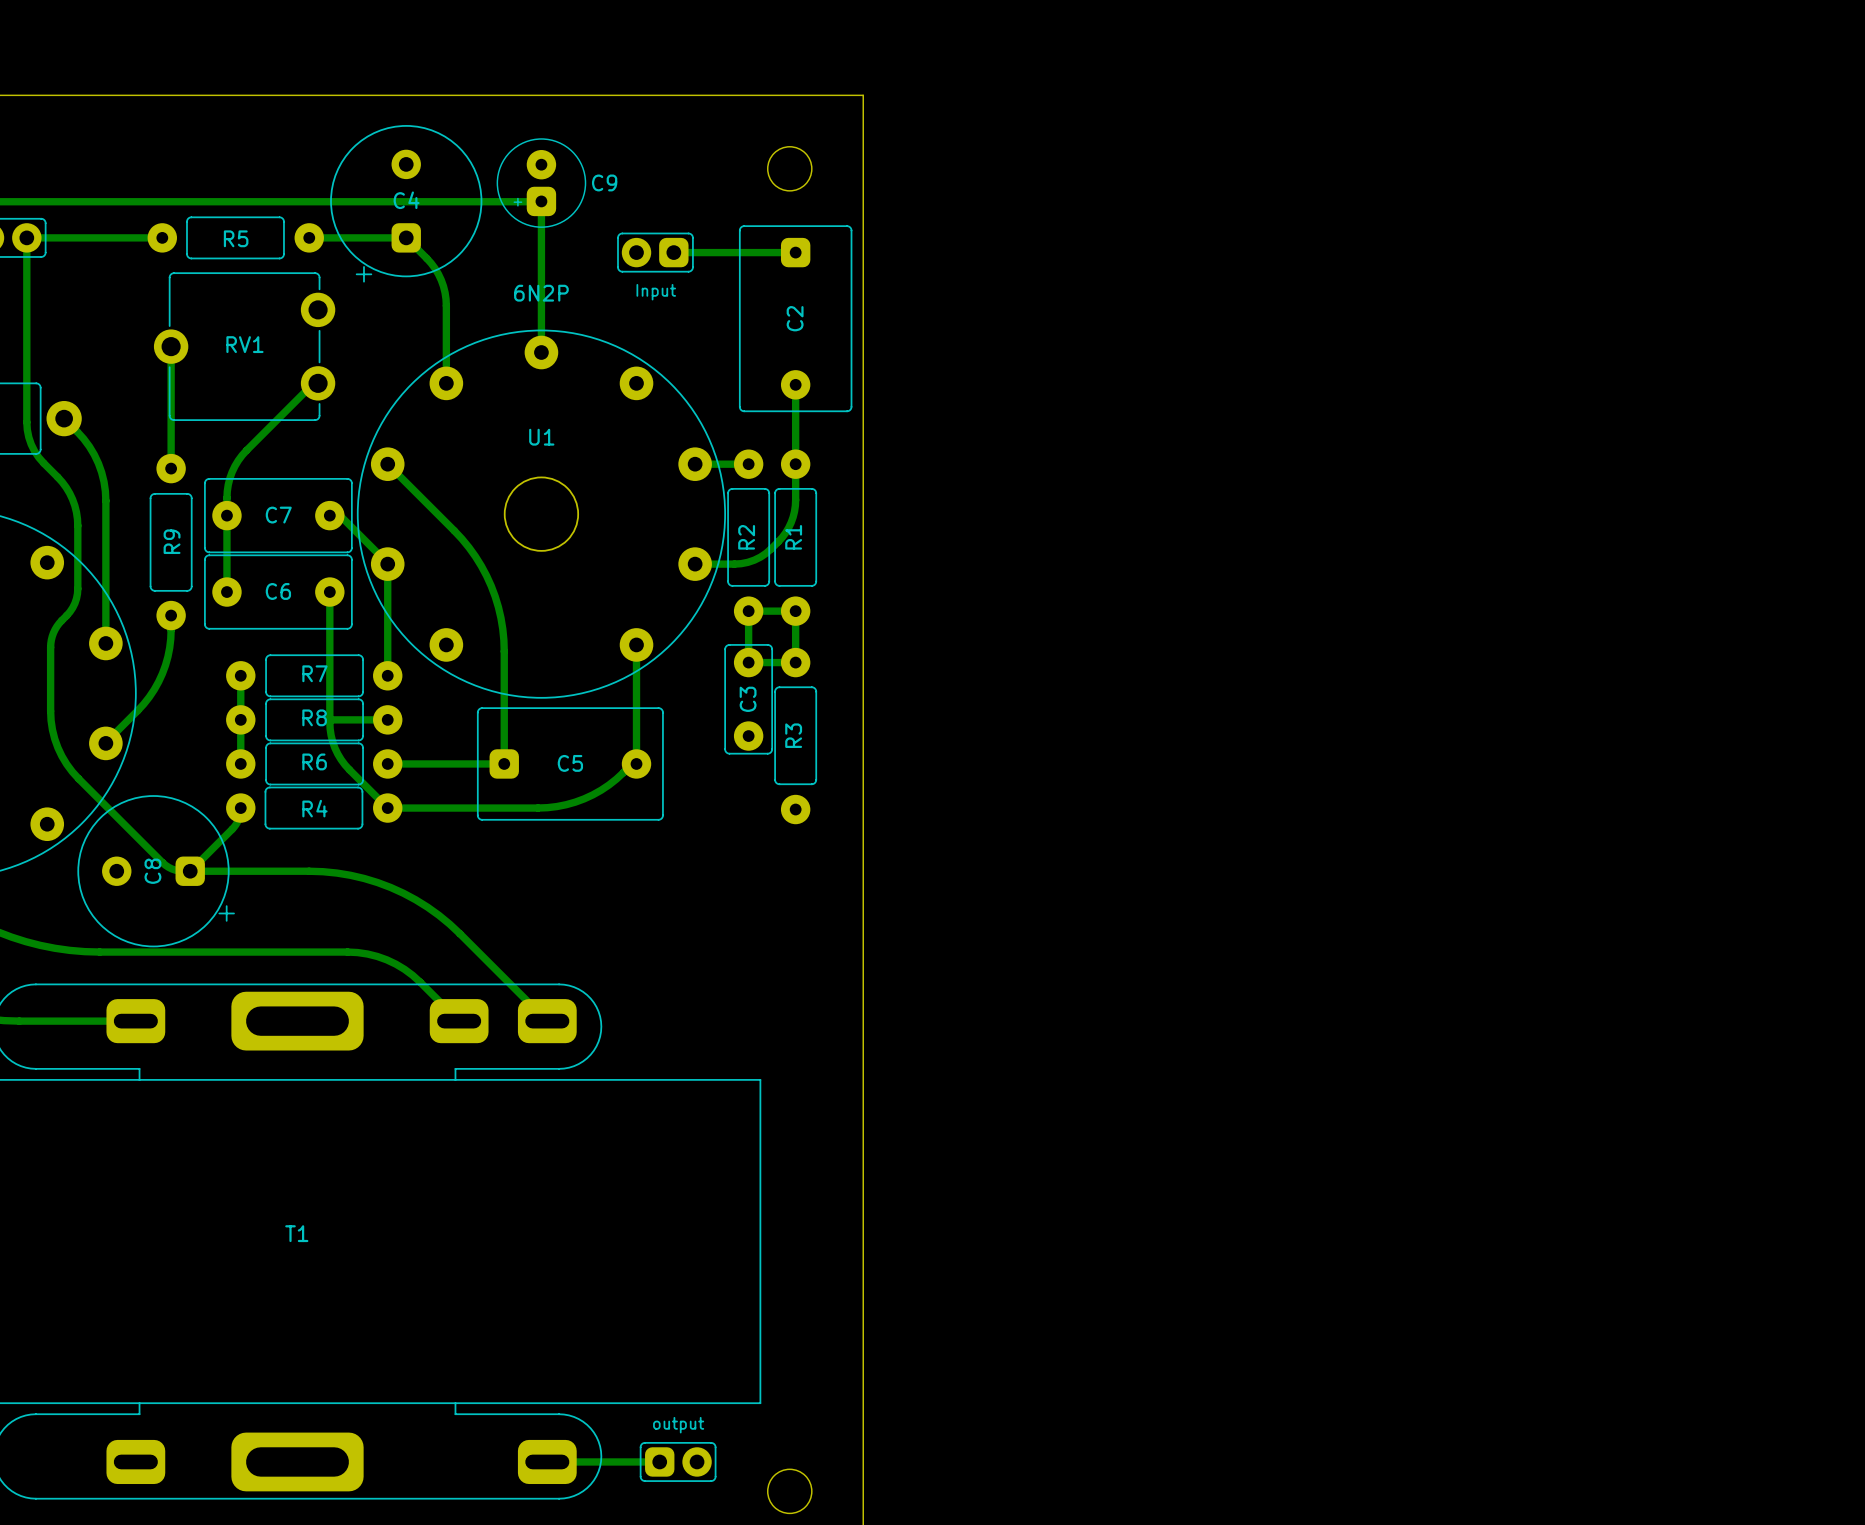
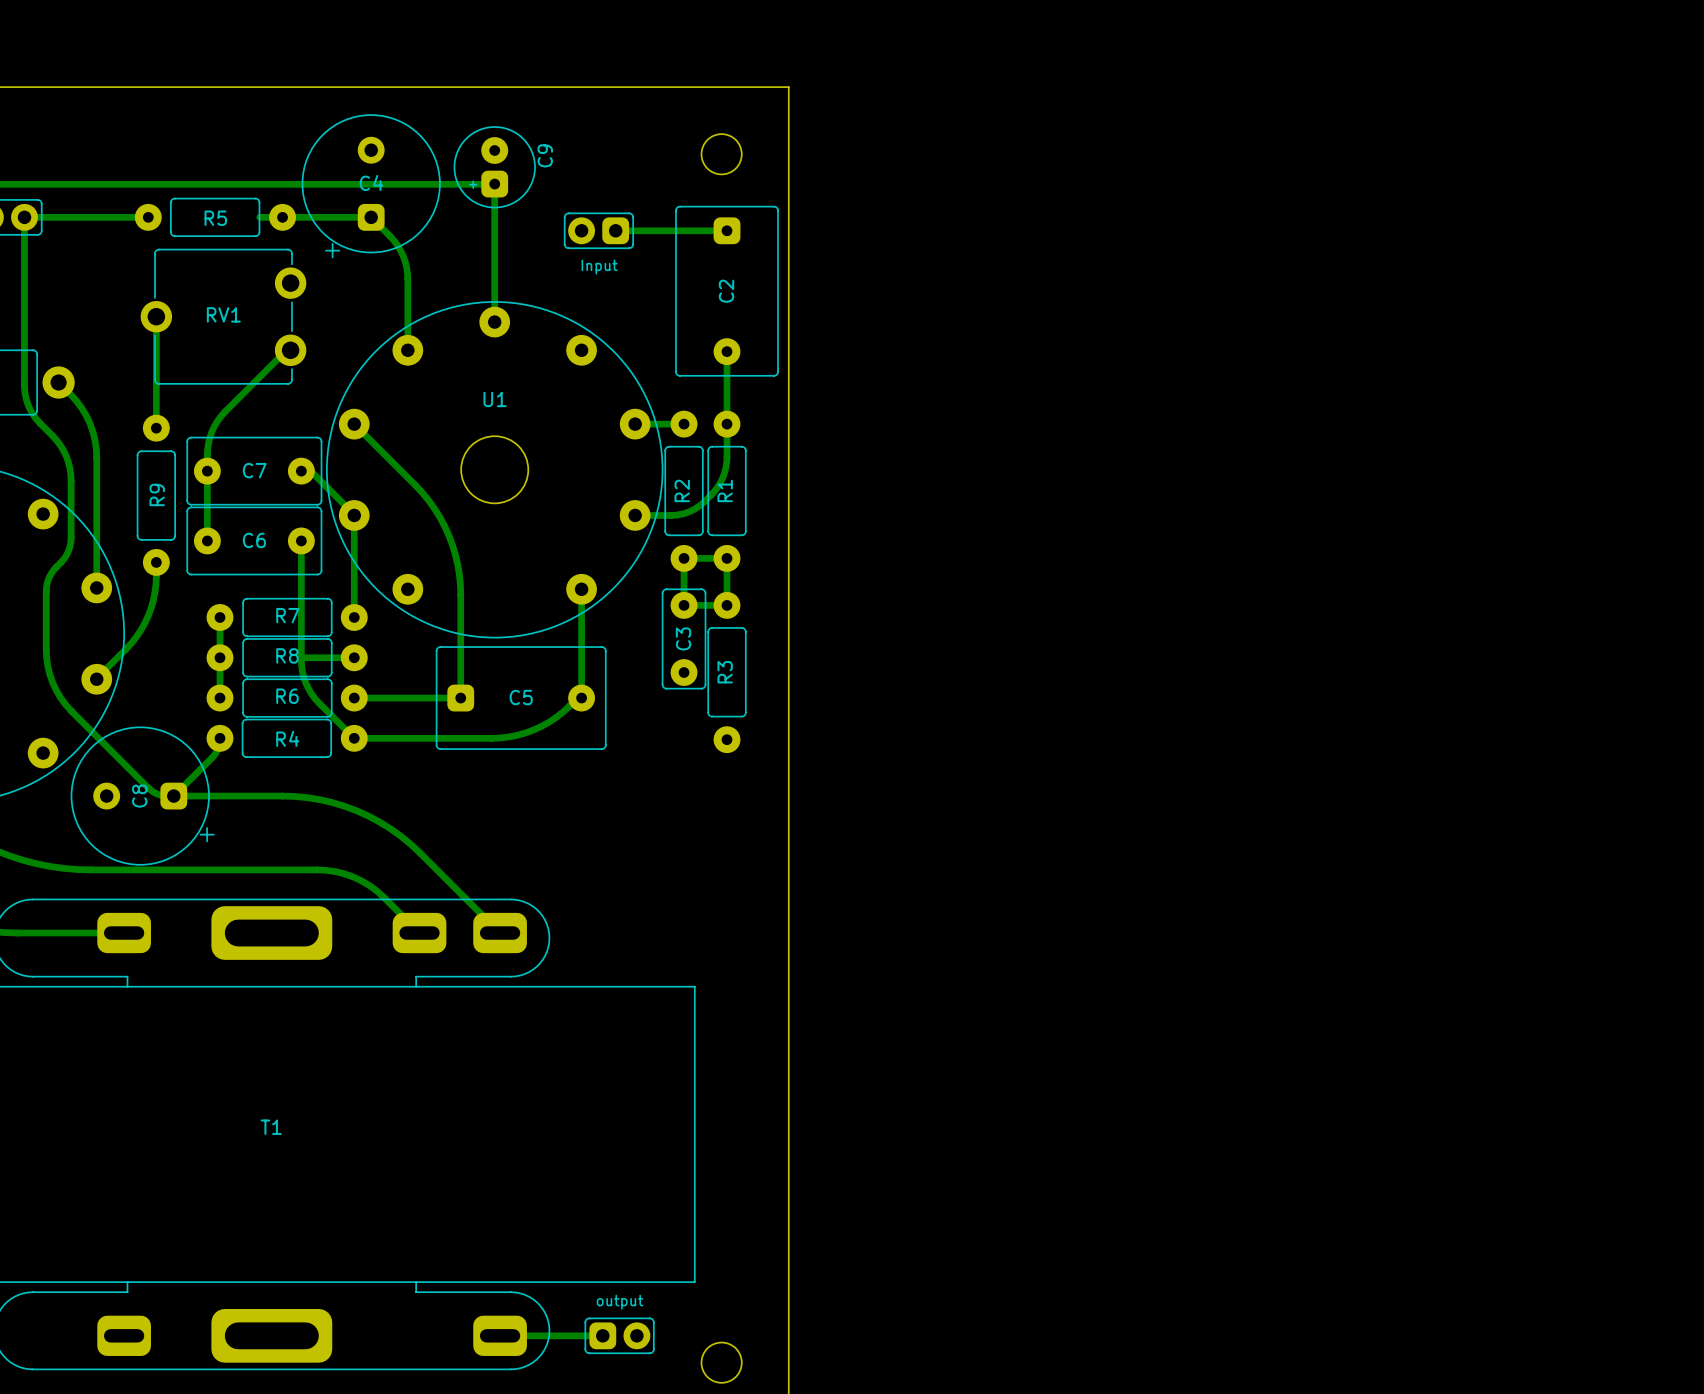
C9 name rotation: 0° (604, 182) -> 90° counterclockwise (545, 155)
bottom track: none -> (259, 217) (282, 217)
U1 value: 6N2P (541, 293) -> none

